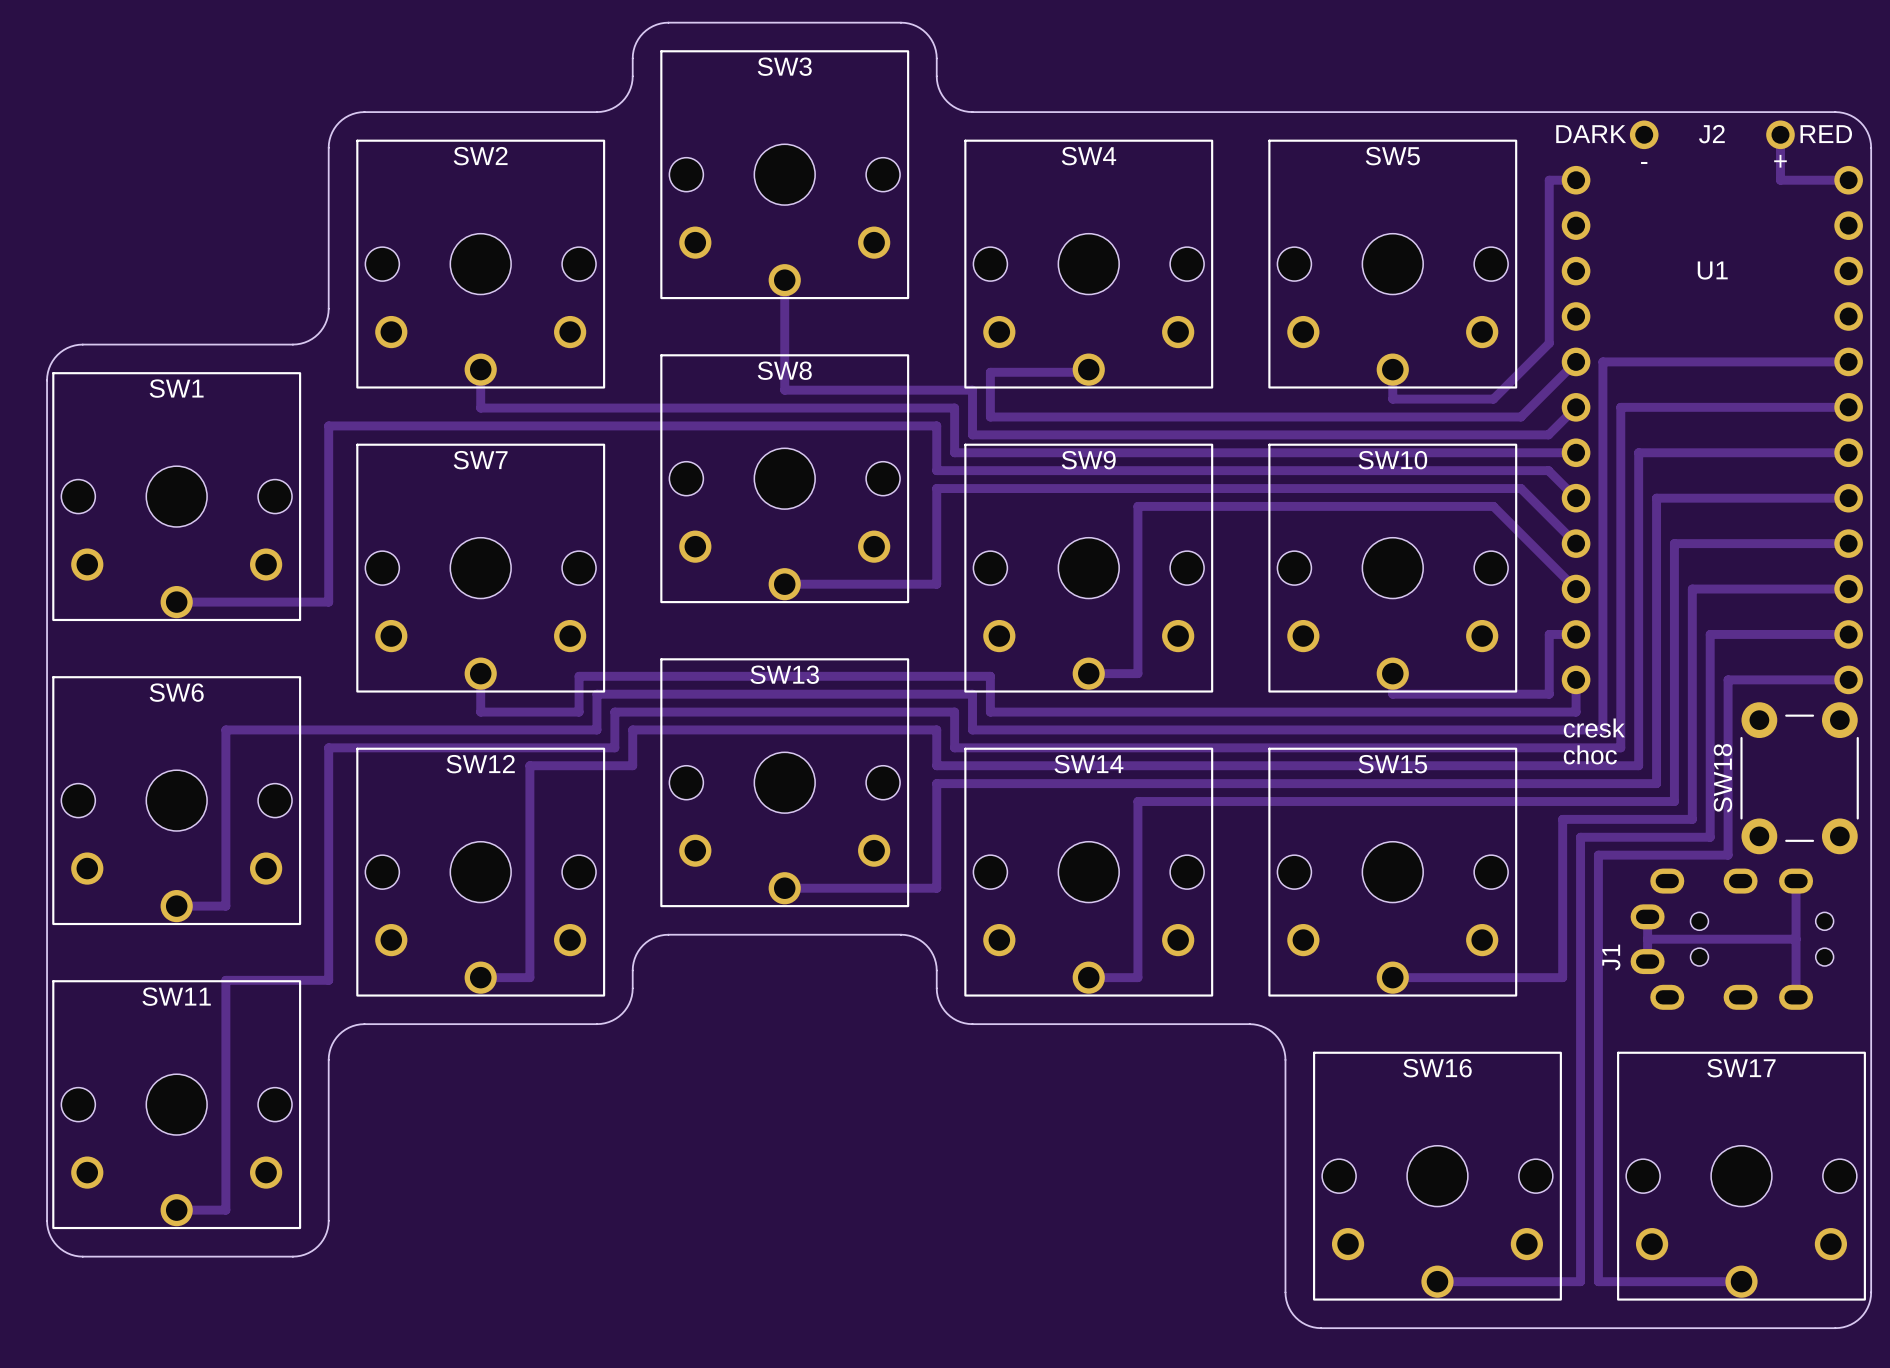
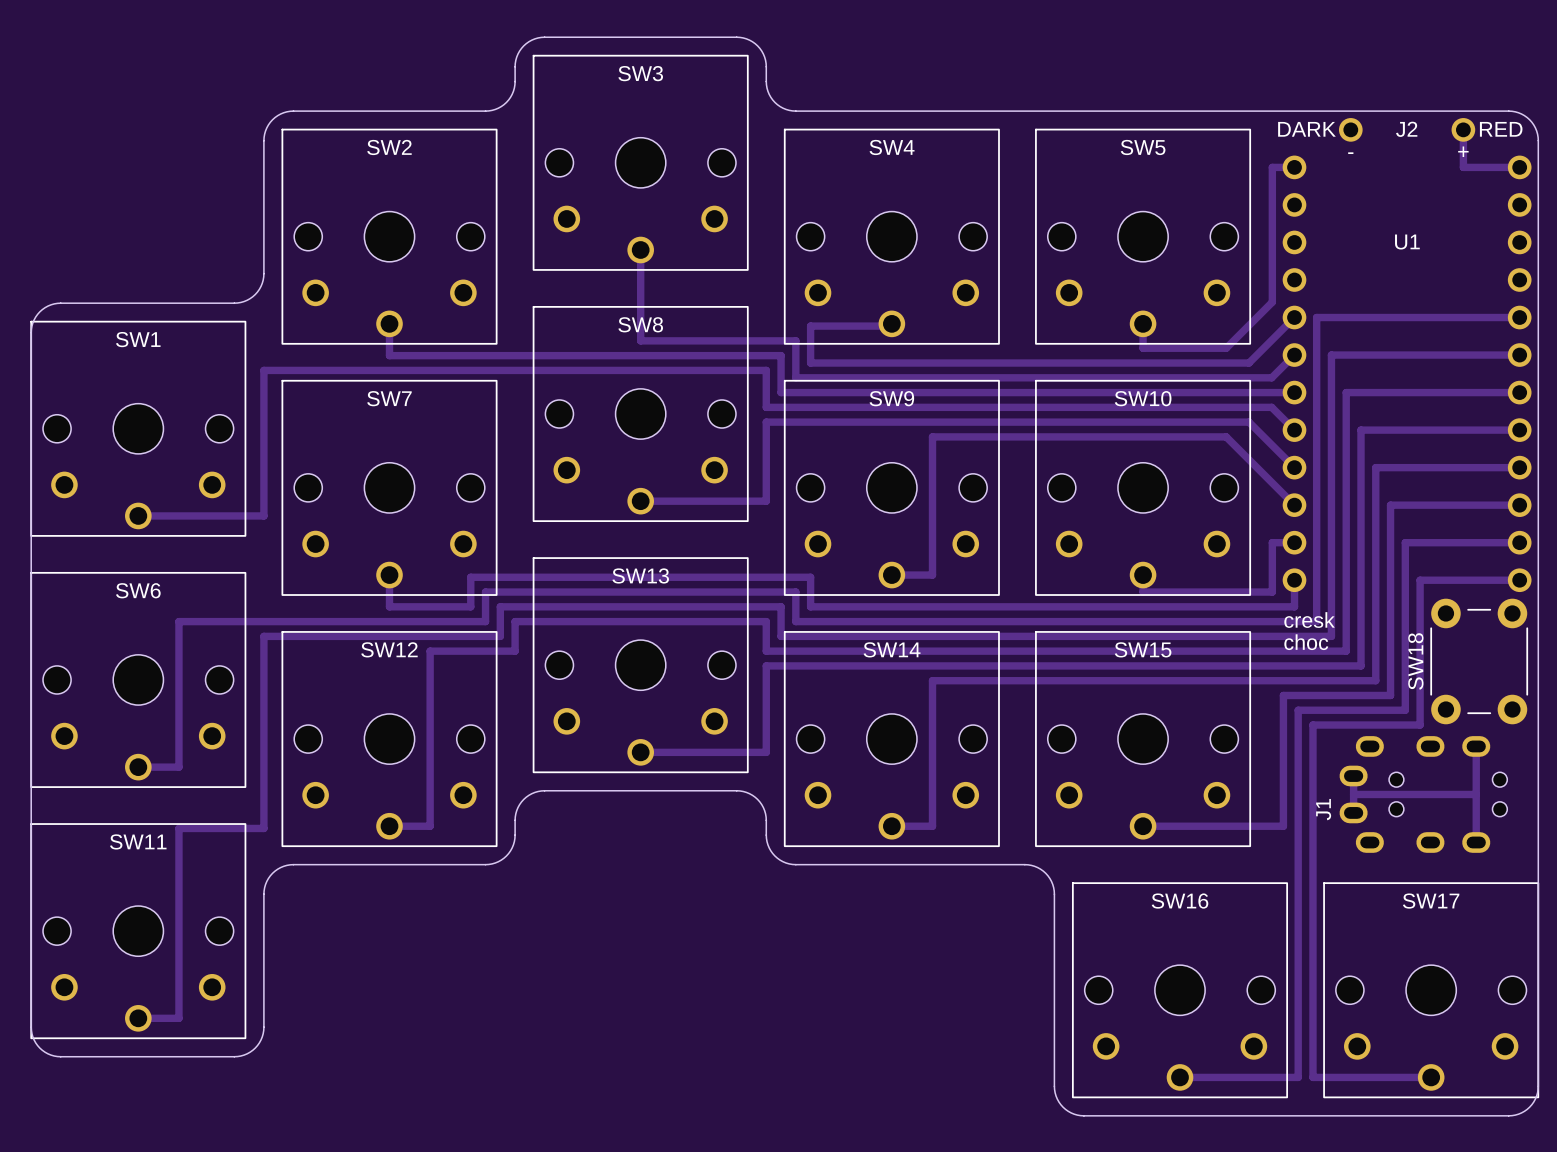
SW3 footprint: [660, 50, 910, 300] -> [532, 54, 749, 271]
SW2 footprint: [356, 139, 606, 389] -> [281, 128, 498, 345]
SW4 footprint: [964, 139, 1214, 389] -> [783, 128, 1000, 345]
SW5 footprint: [1268, 139, 1518, 389] -> [1035, 128, 1252, 345]
SW8 footprint: [660, 354, 910, 604] -> [532, 305, 749, 523]
SW1 footprint: [52, 372, 302, 622] -> [30, 320, 247, 537]
SW7 footprint: [356, 443, 606, 693] -> [281, 379, 498, 596]
SW9 footprint: [964, 443, 1214, 693] -> [783, 379, 1000, 596]
SW10 footprint: [1268, 443, 1518, 693] -> [1035, 379, 1252, 596]
SW13 footprint: [660, 658, 910, 908] -> [532, 557, 749, 774]
SW6 footprint: [52, 676, 302, 926] -> [30, 571, 247, 788]
SW12 footprint: [356, 747, 606, 997] -> [281, 631, 498, 848]
SW14 footprint: [964, 747, 1214, 997] -> [783, 631, 1000, 848]
SW15 footprint: [1268, 747, 1518, 997] -> [1035, 631, 1252, 848]
SW11 footprint: [52, 980, 302, 1230] -> [30, 823, 247, 1040]
SW16 footprint: [1313, 1051, 1562, 1301] -> [1071, 882, 1289, 1099]
SW17 footprint: [1617, 1051, 1866, 1301] -> [1323, 882, 1540, 1099]

